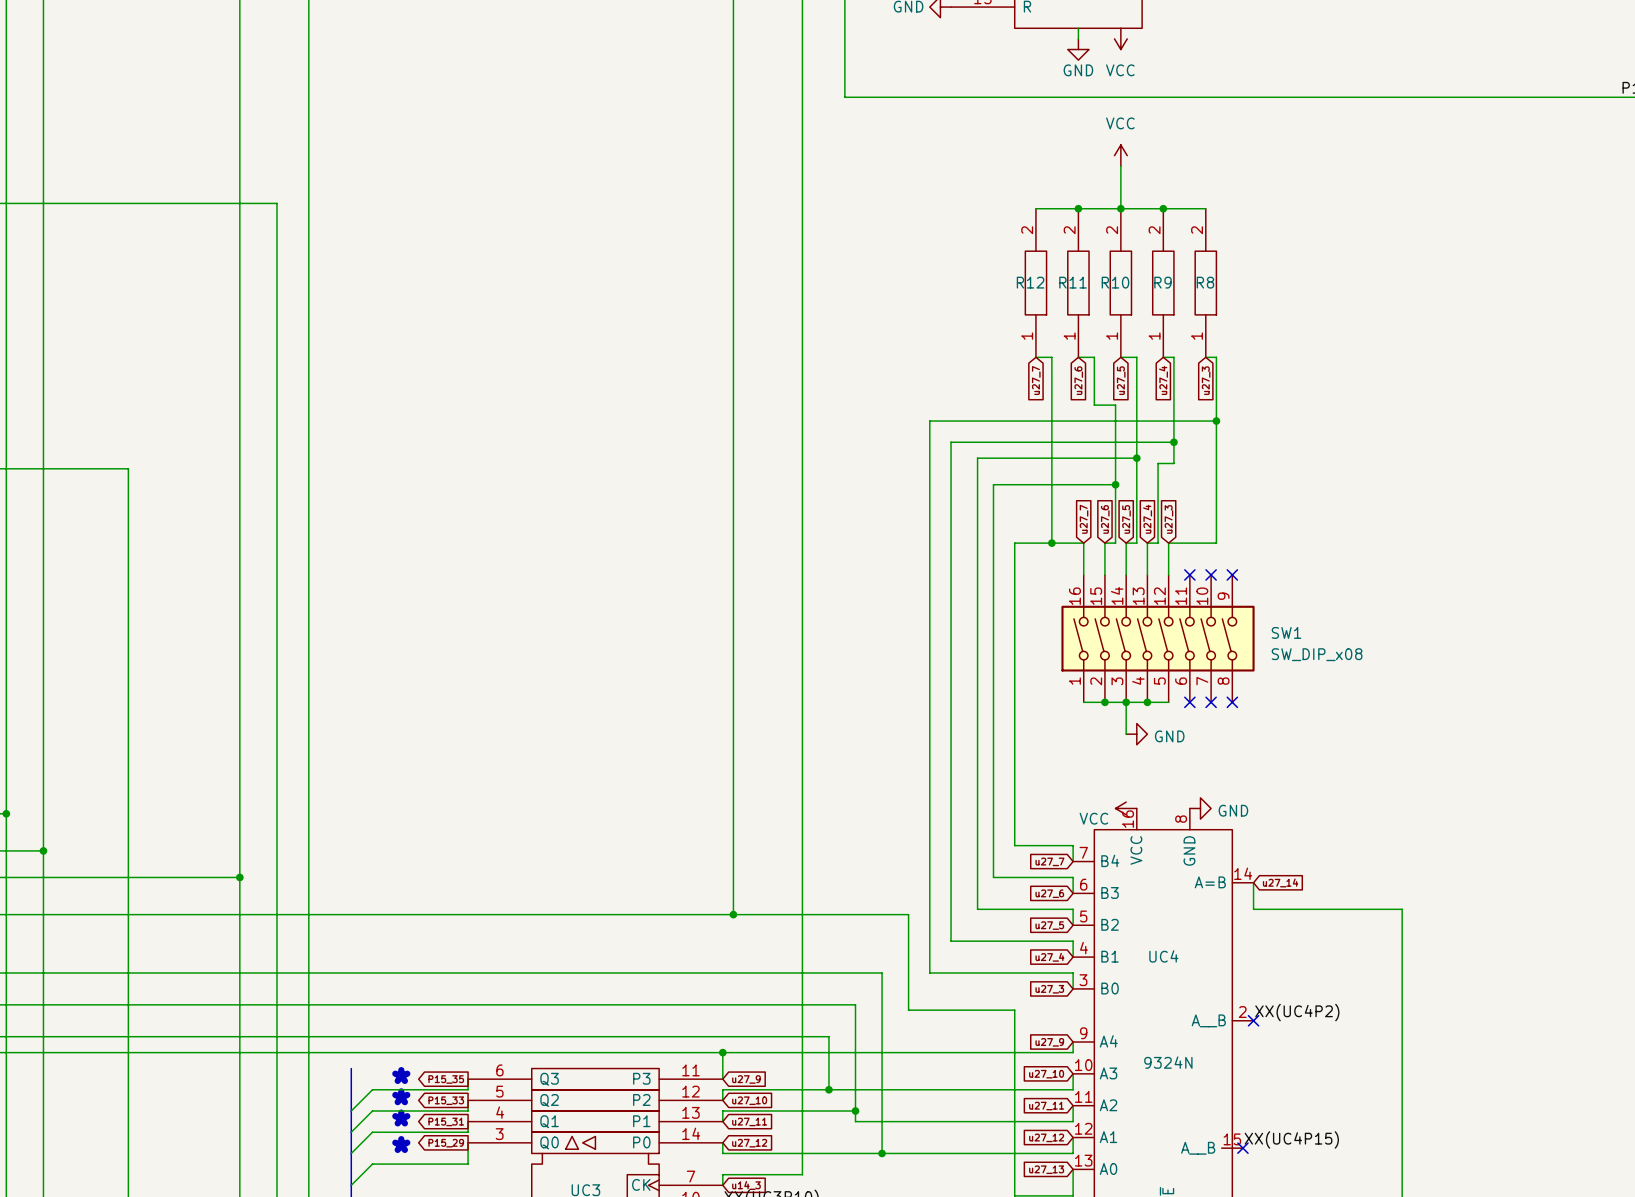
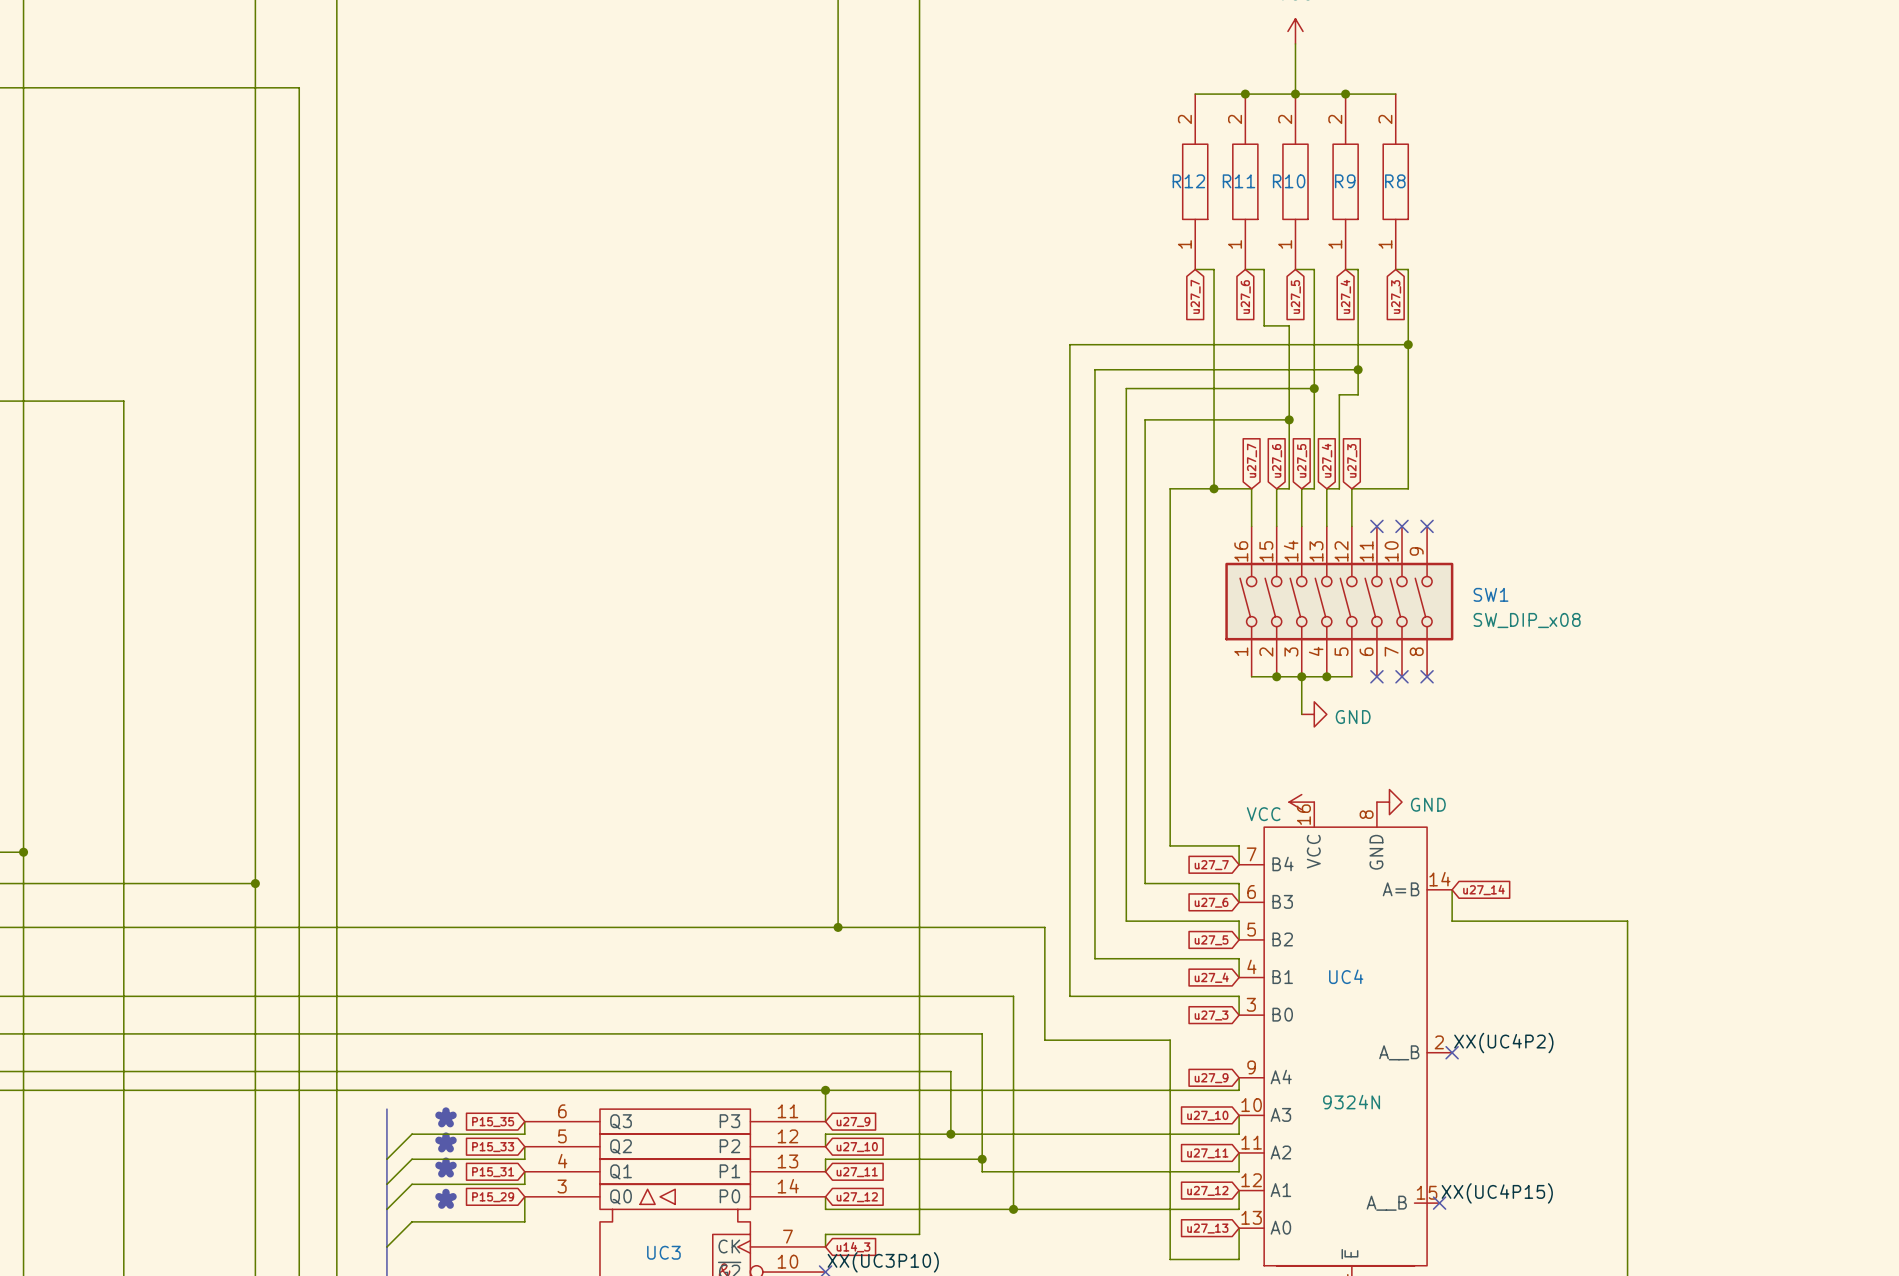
global label shape: output (446, 1079) -> input (493, 1122)
global label shape: output (446, 1100) -> input (493, 1147)
global label shape: output (446, 1121) -> input (493, 1172)
global label shape: output (446, 1143) -> input (493, 1197)

